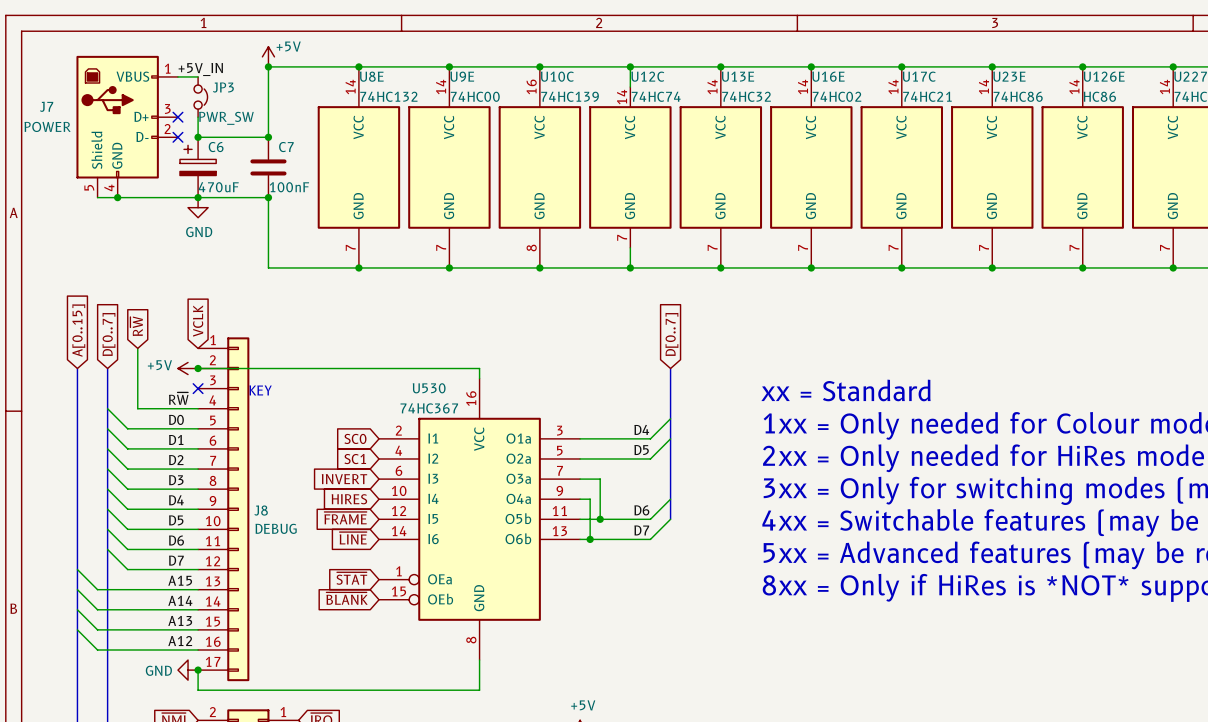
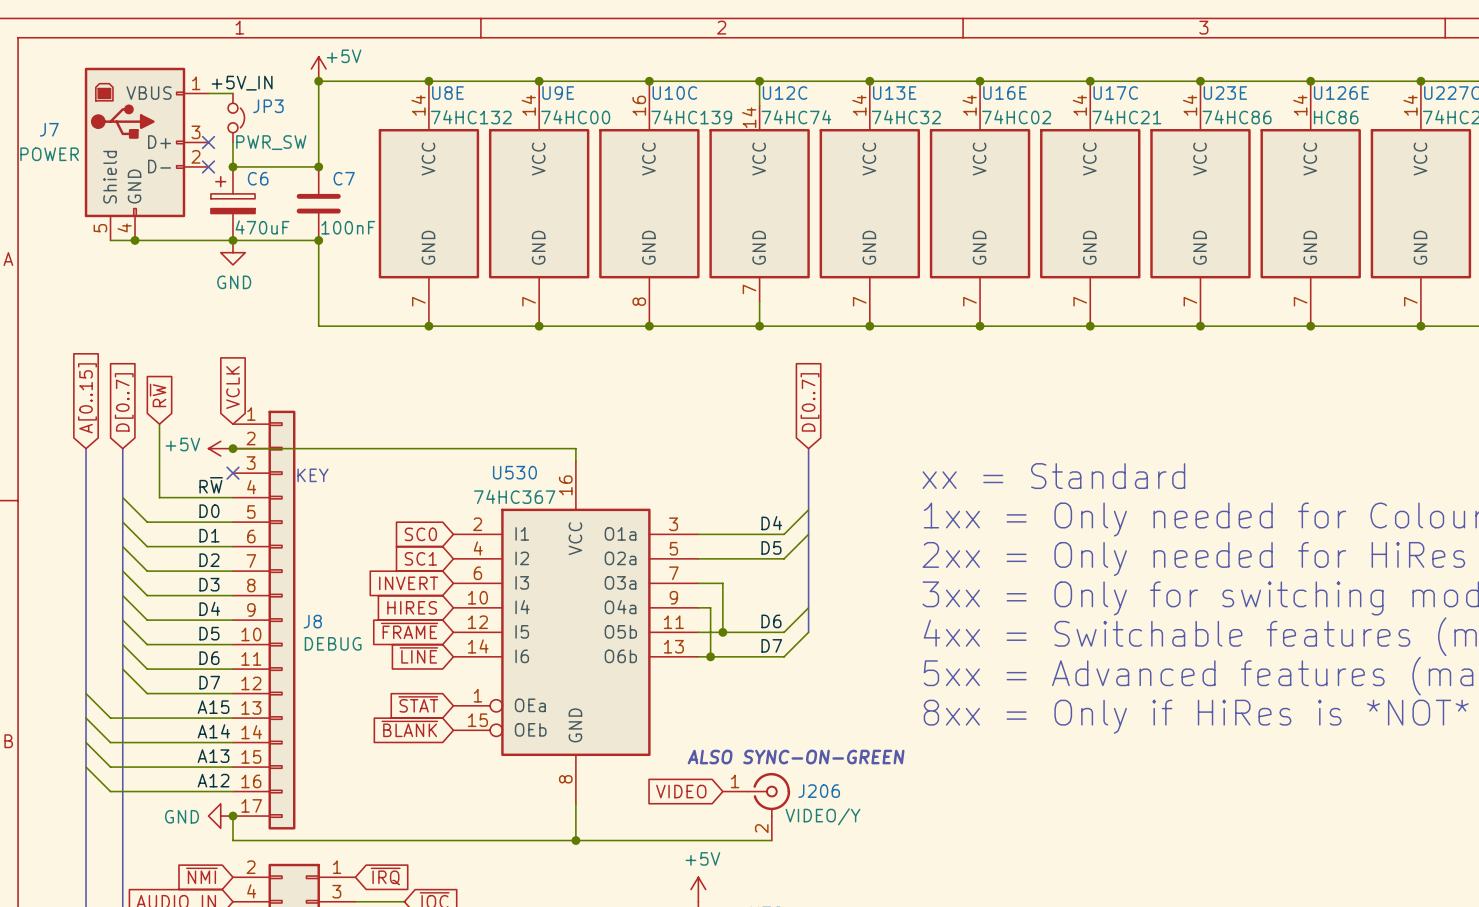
text: none -> ALSO SYNC-ON-GREEN (796, 757)
global label: none -> VIDEO (681, 791)
J206: none -> VIDEO/Y (756, 806)
wire: none -> (575, 840) (771, 840)
junction: none -> (575, 840)

